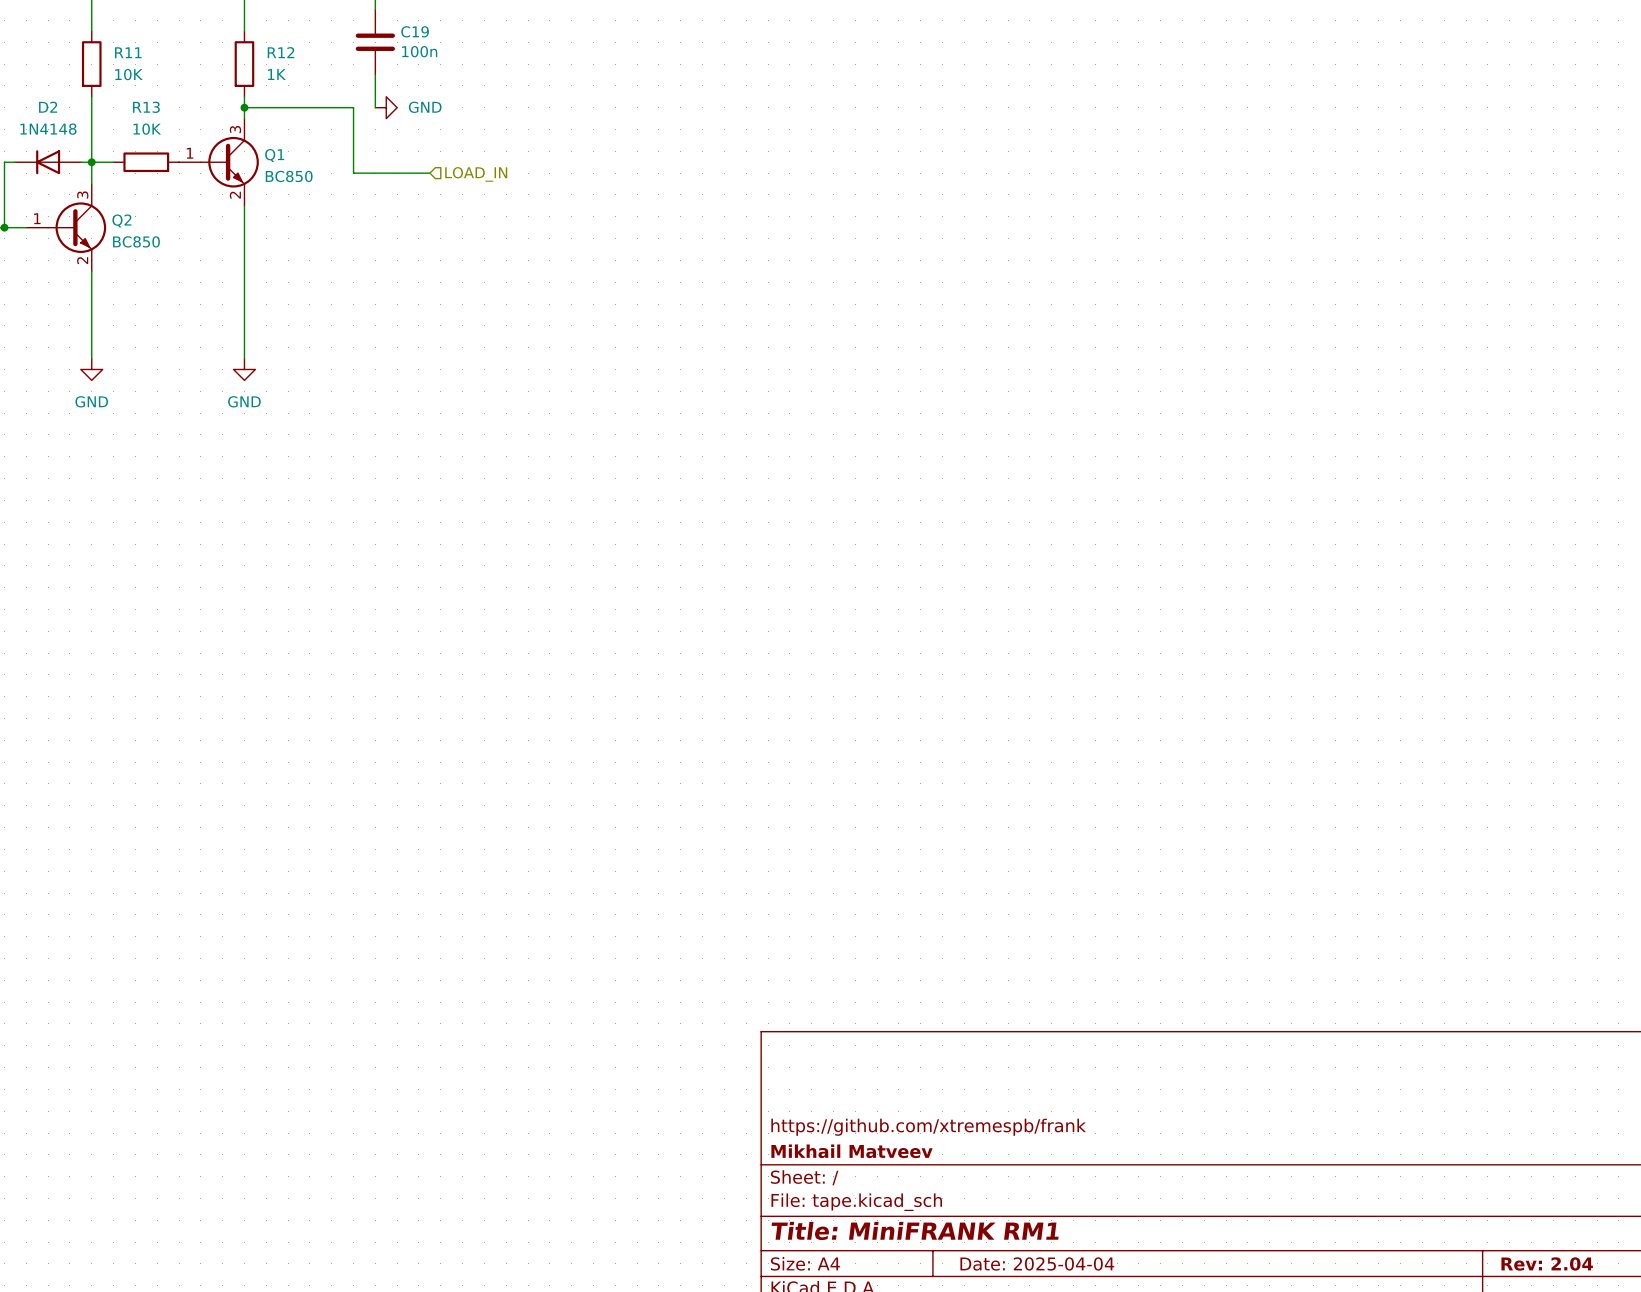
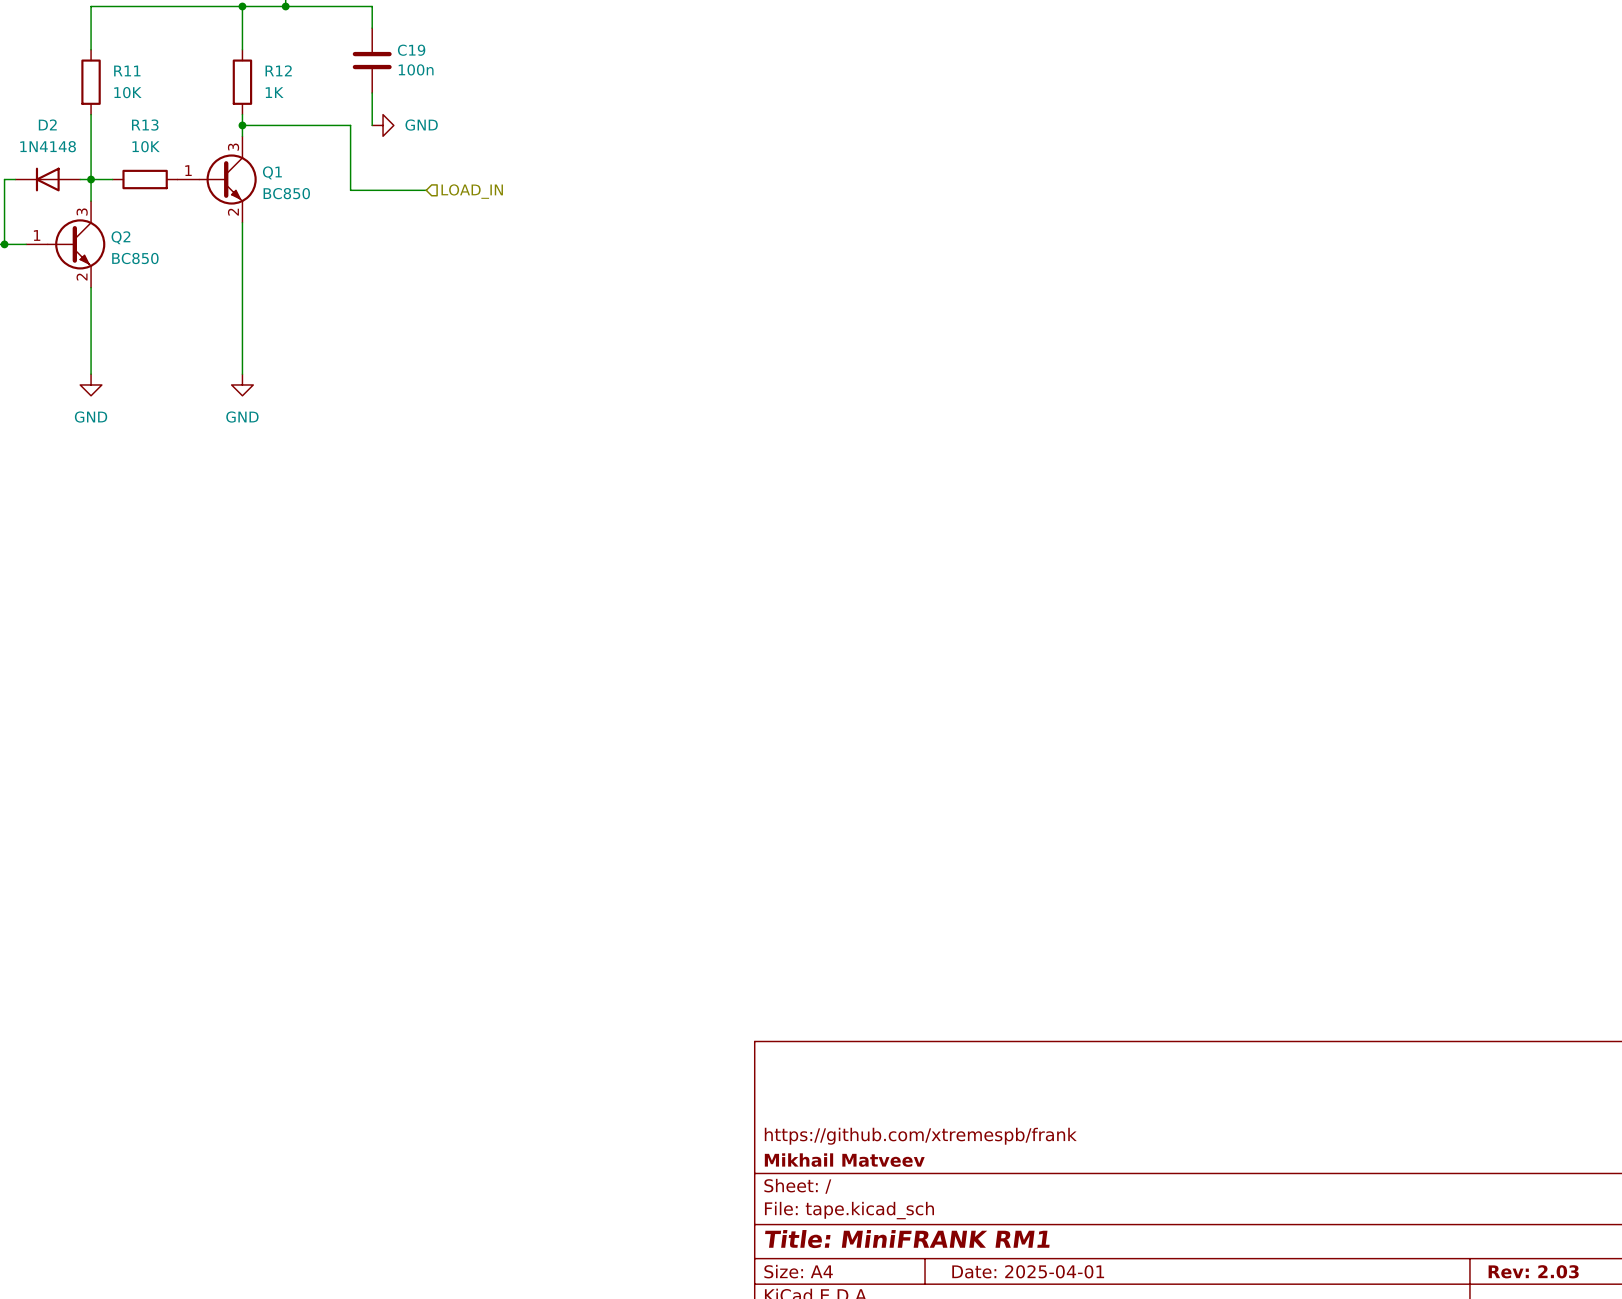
title block: Date: 2025-04-04 (1037, 1263) -> Date: 2025-04-01 (1028, 1271)
title block: Rev: 2.04 (1547, 1263) -> Rev: 2.03 (1533, 1271)

